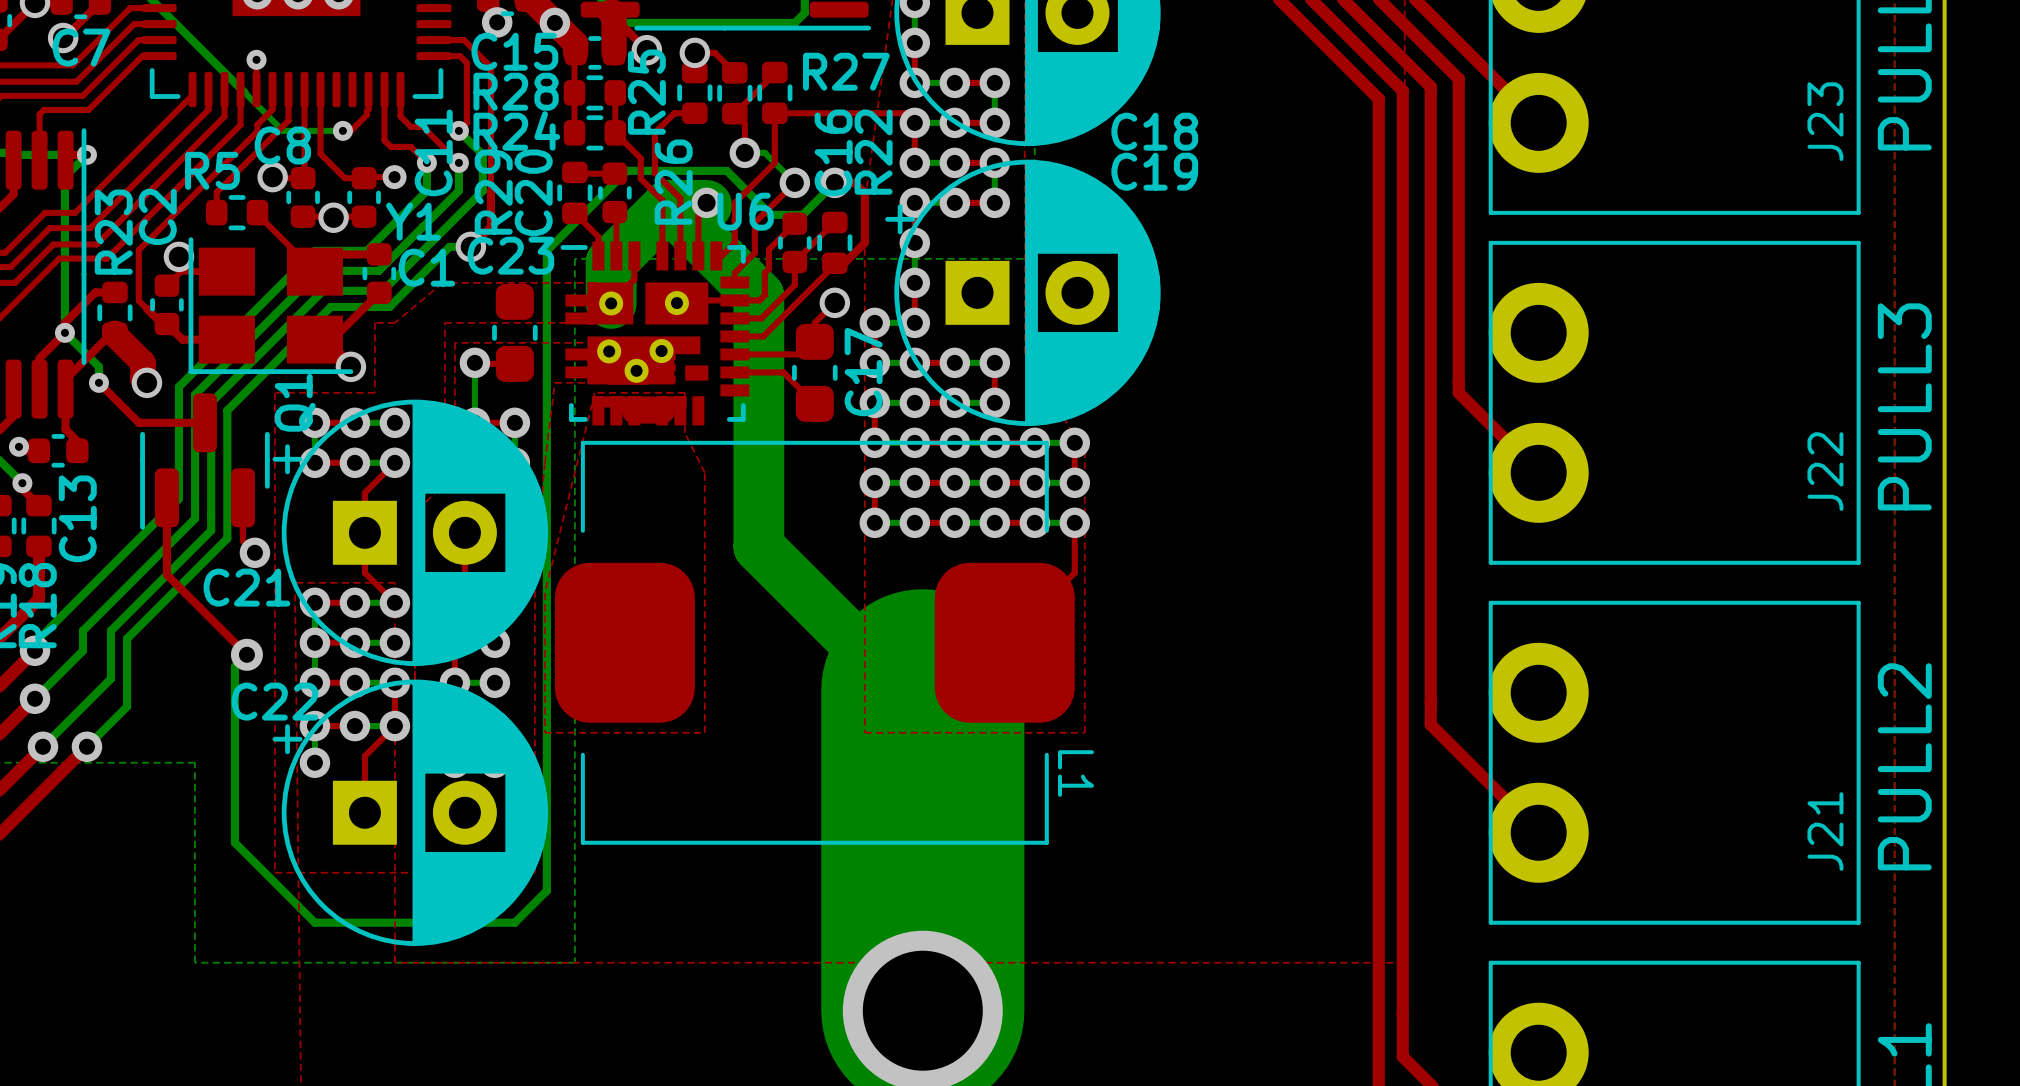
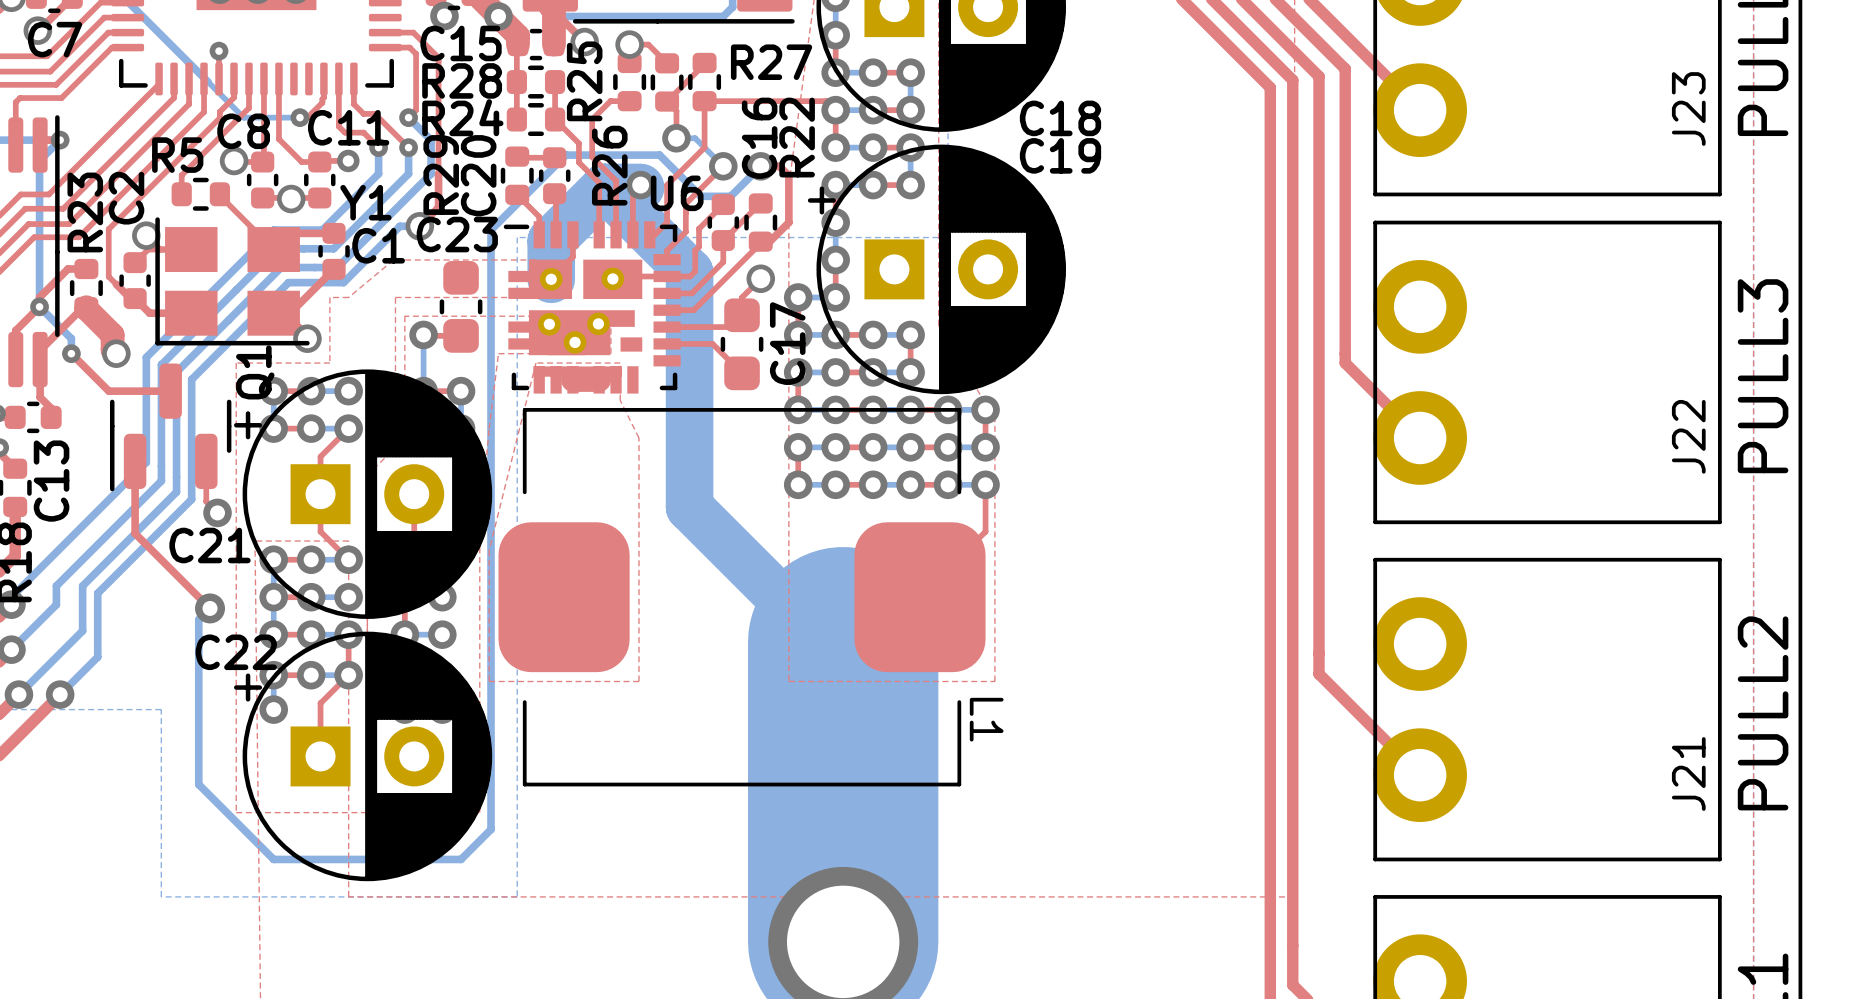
C11 name rotation: 0° (433, 152) -> 90° clockwise (348, 127)

